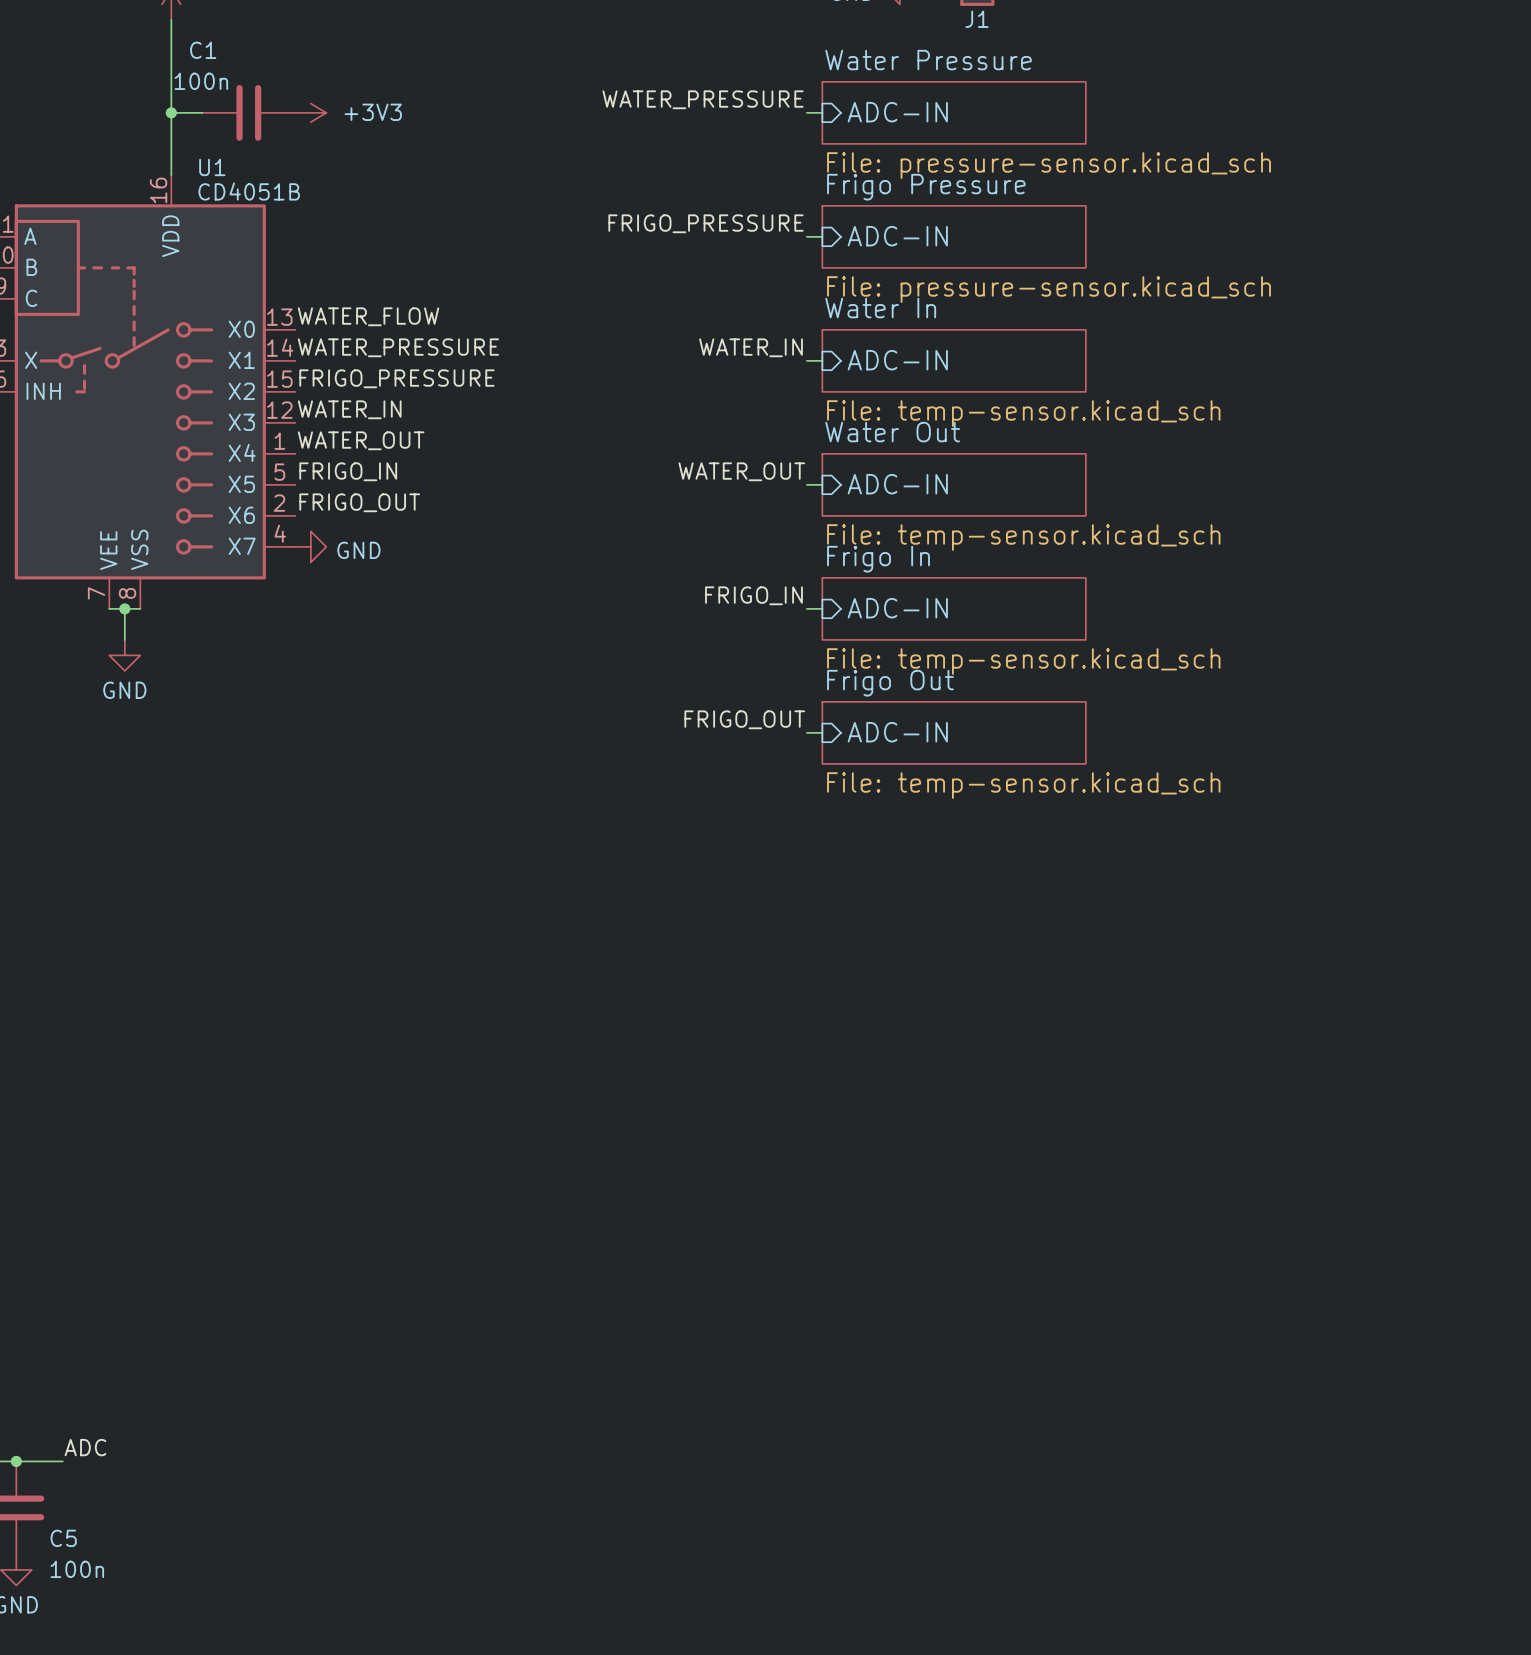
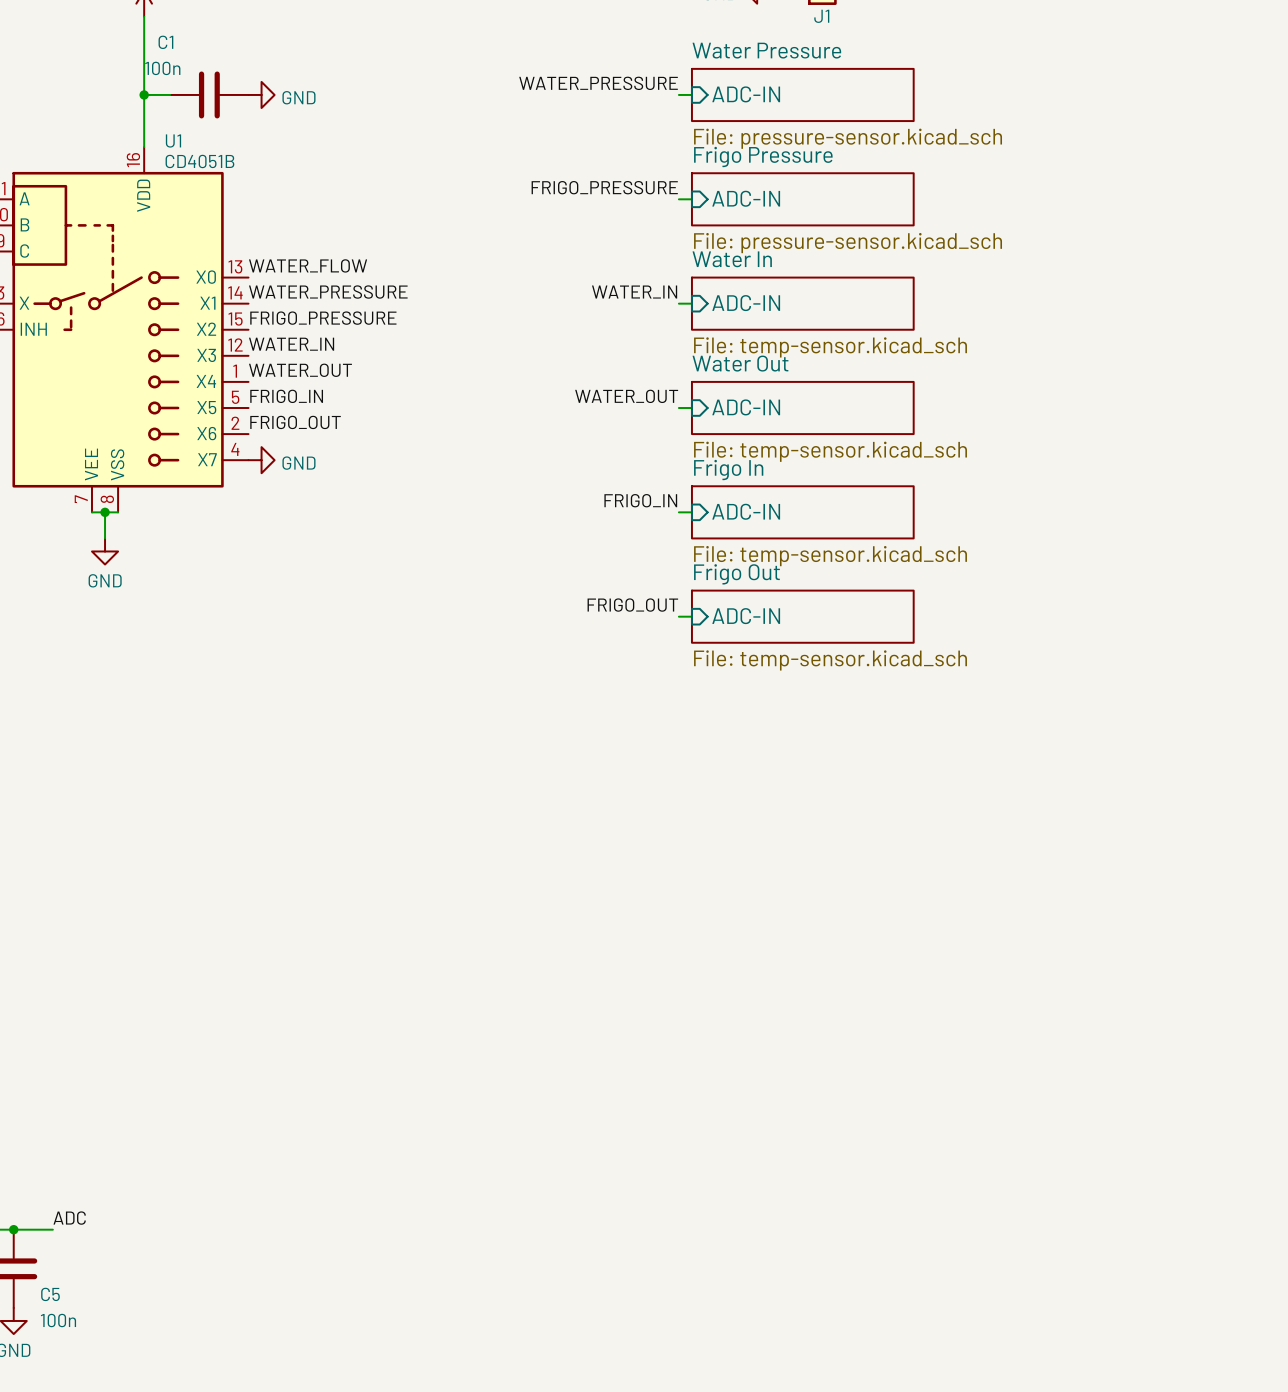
power symbol: +3V3 (310, 112) -> GND (261, 94)

